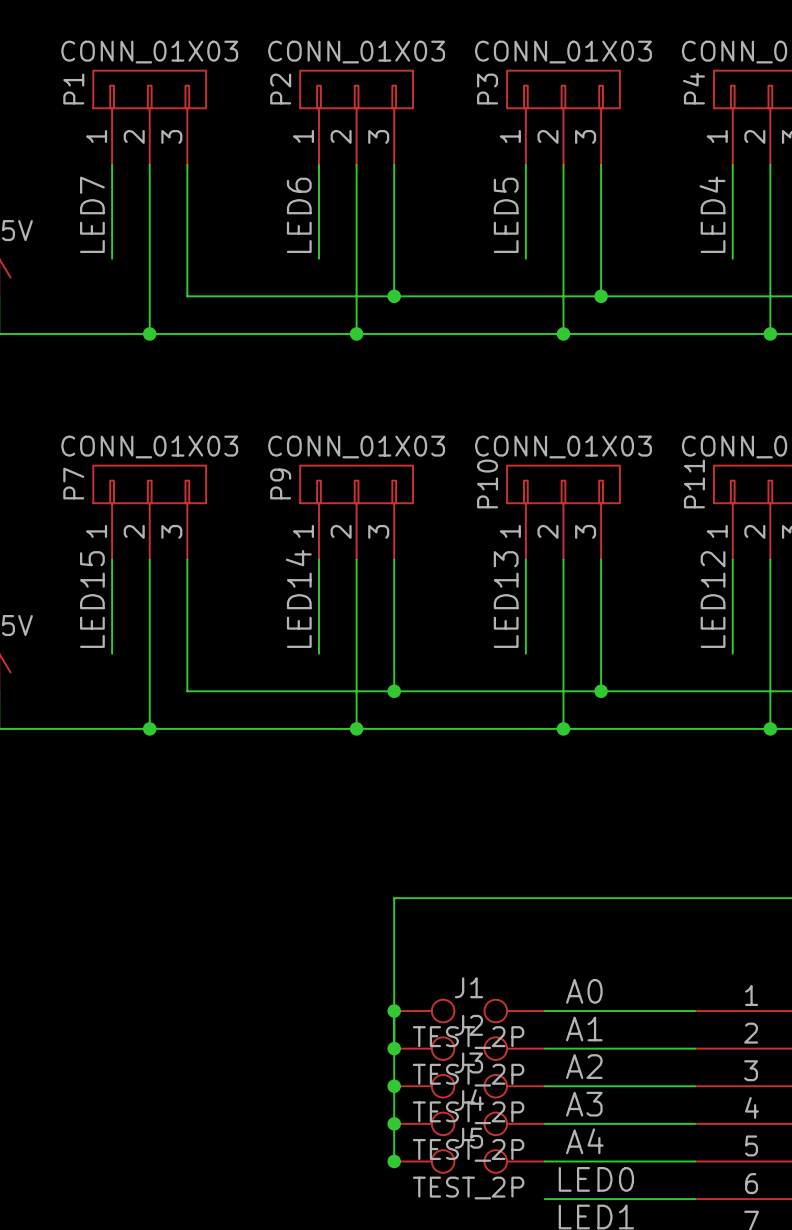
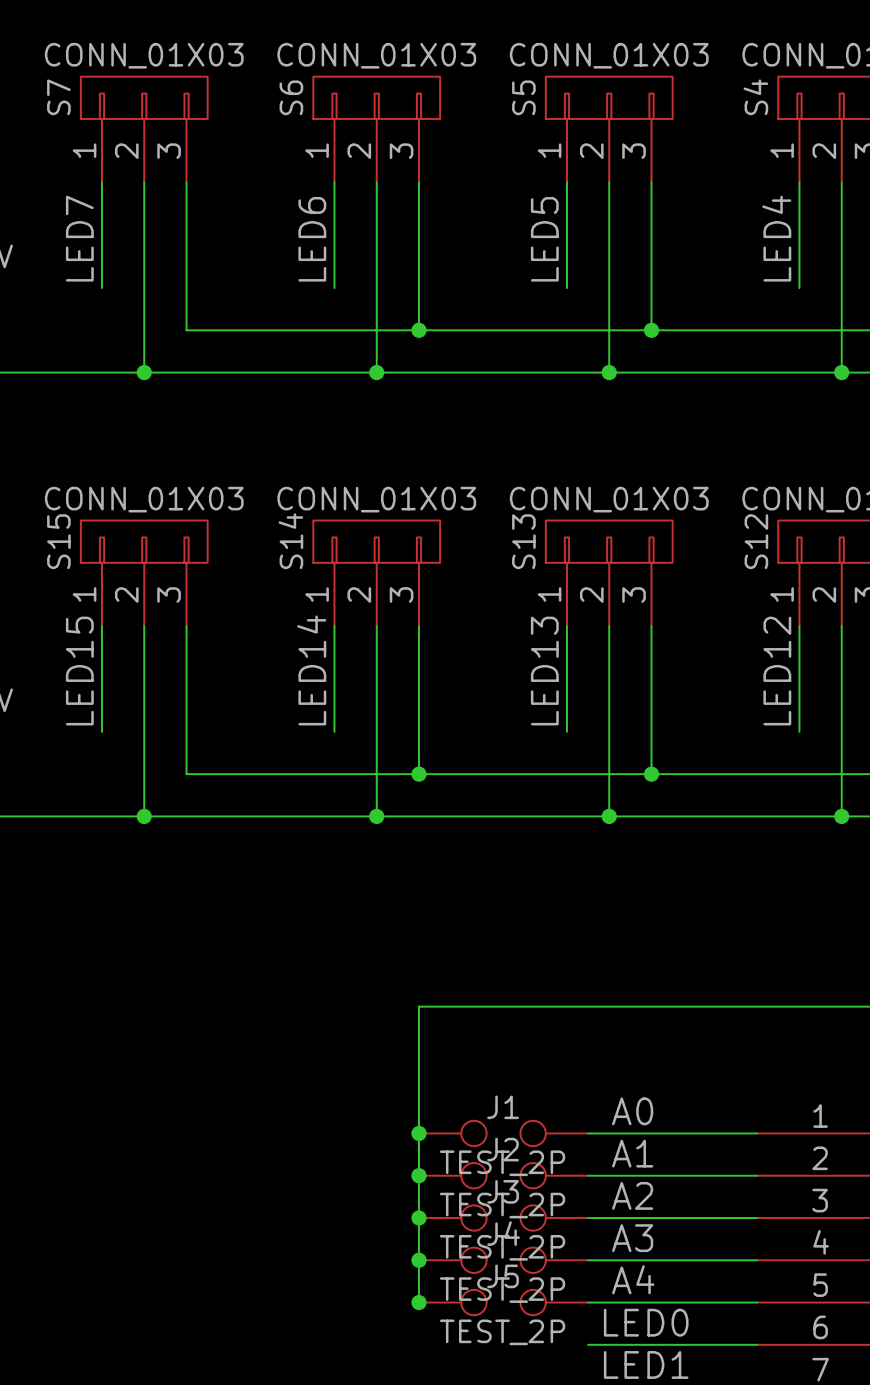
P4 name: P4 (693, 88) -> S4 (755, 97)
P1 name: P1 (73, 89) -> S7 (58, 97)
P2 name: P2 (280, 89) -> S6 (291, 97)
P3 name: P3 (487, 89) -> S5 (523, 97)
P7 name: P7 (73, 483) -> S15 (58, 541)
P9 name: P9 (280, 483) -> S14 (290, 541)
P10 name: P10 (487, 483) -> S13 (523, 541)
P11 name: P11 (694, 483) -> S12 (756, 541)

